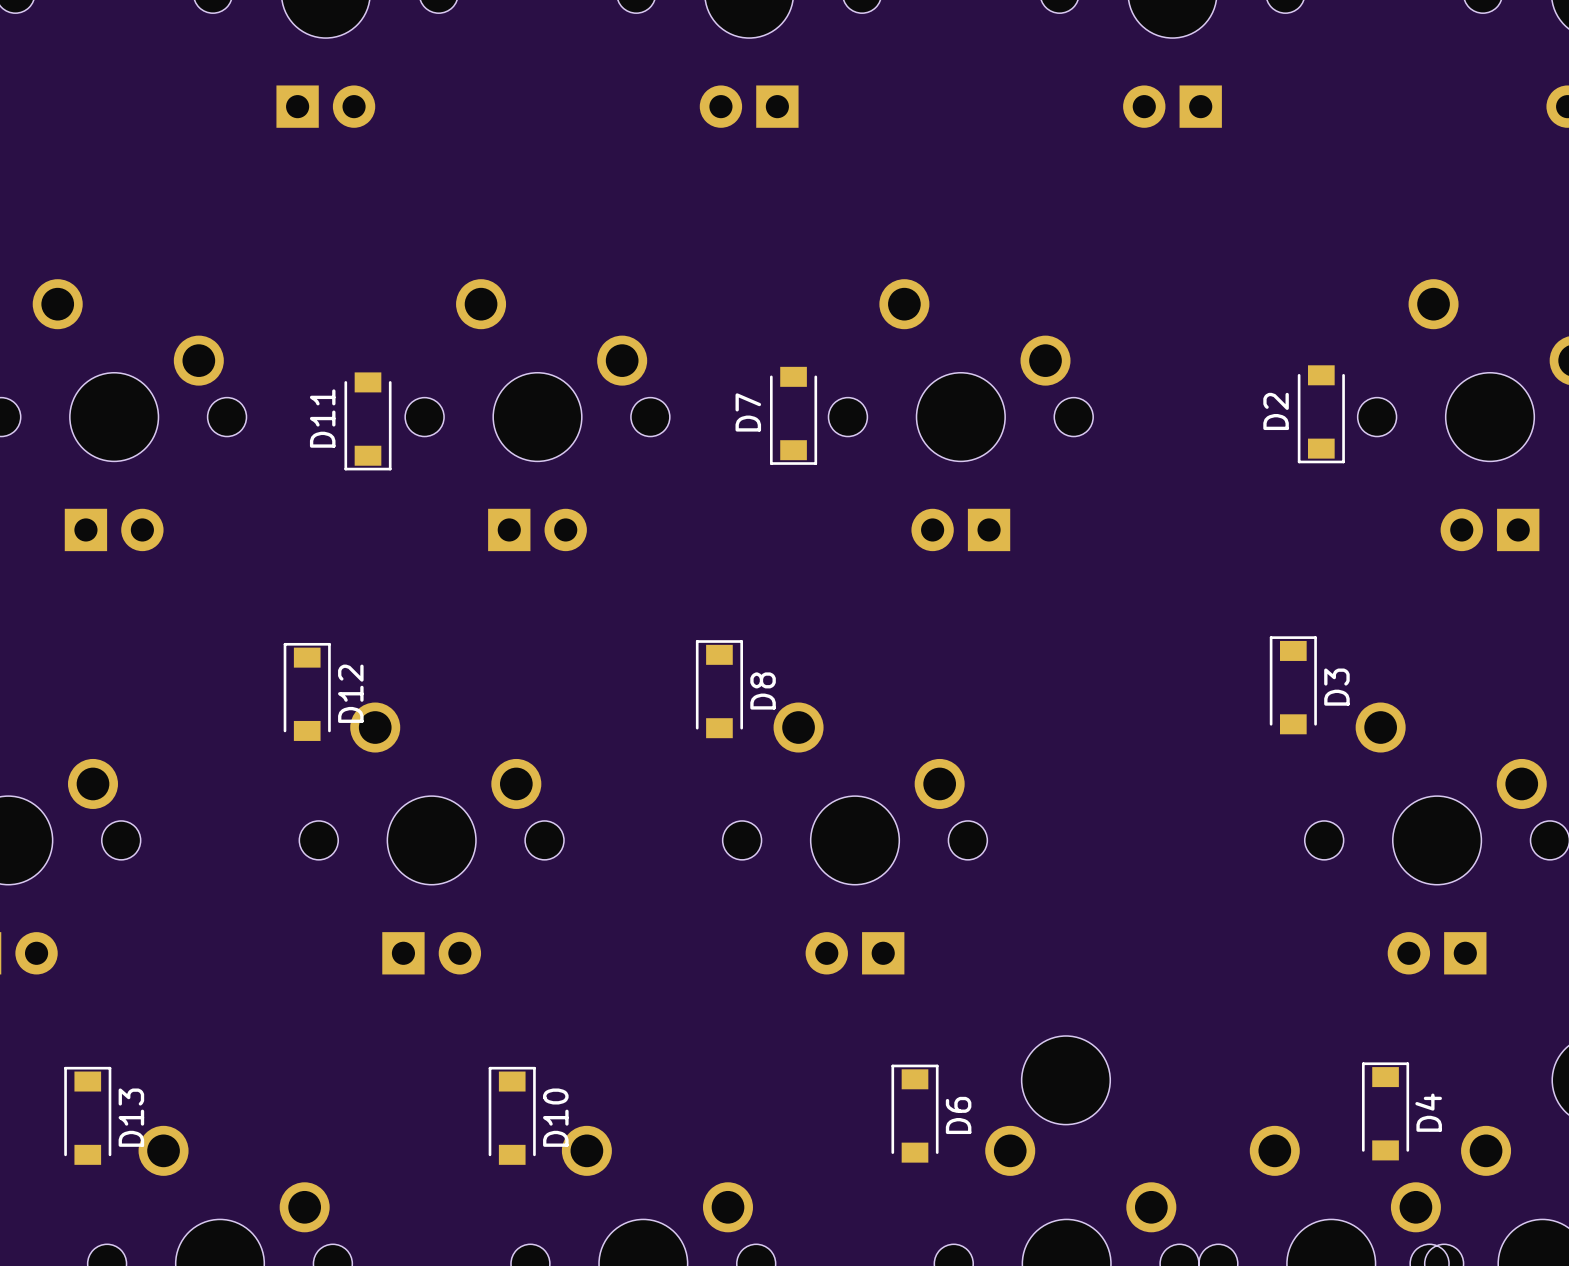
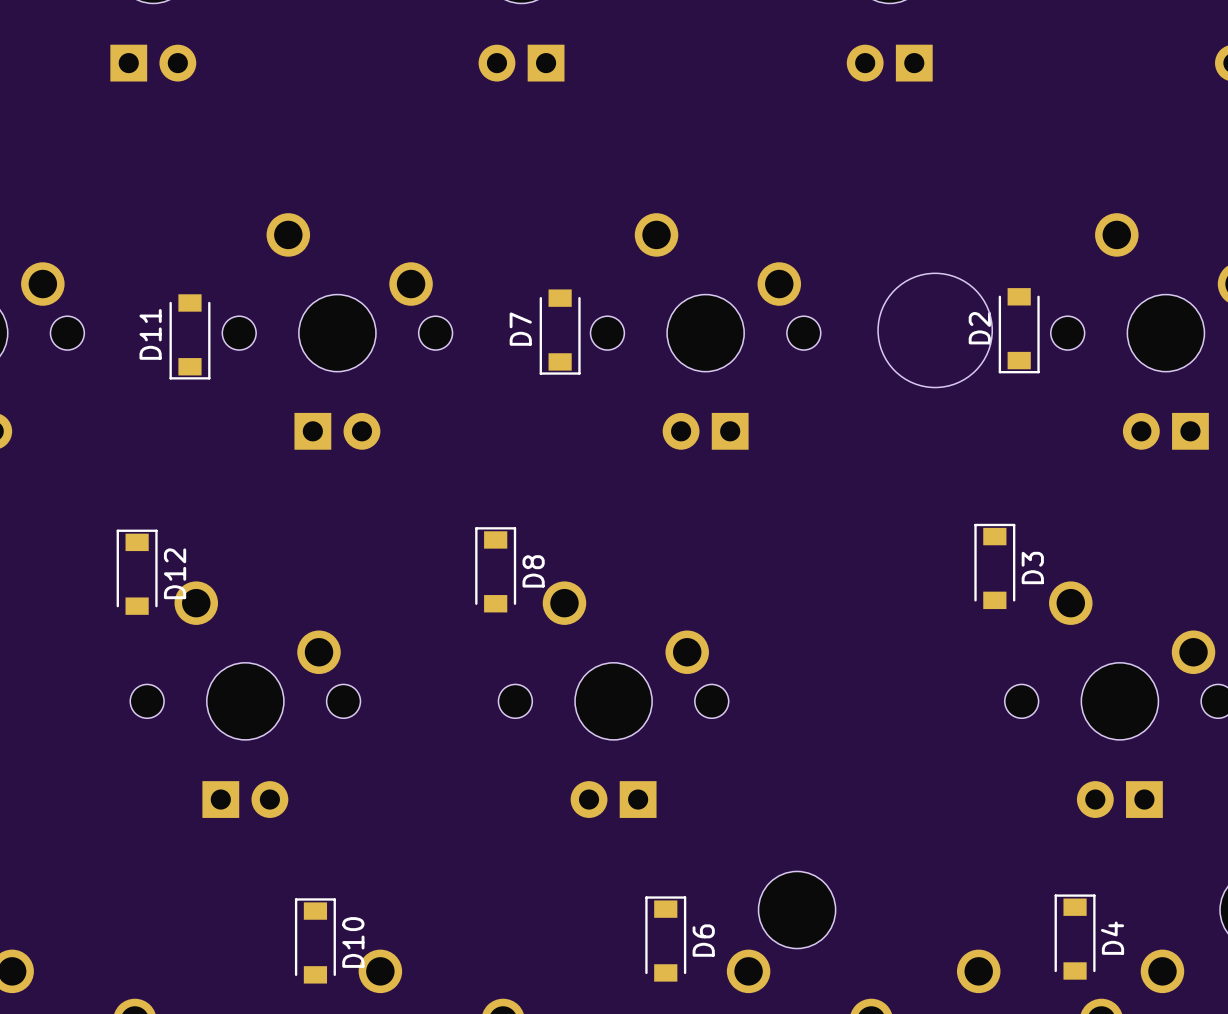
round board edge: none -> [877, 272, 993, 389]

